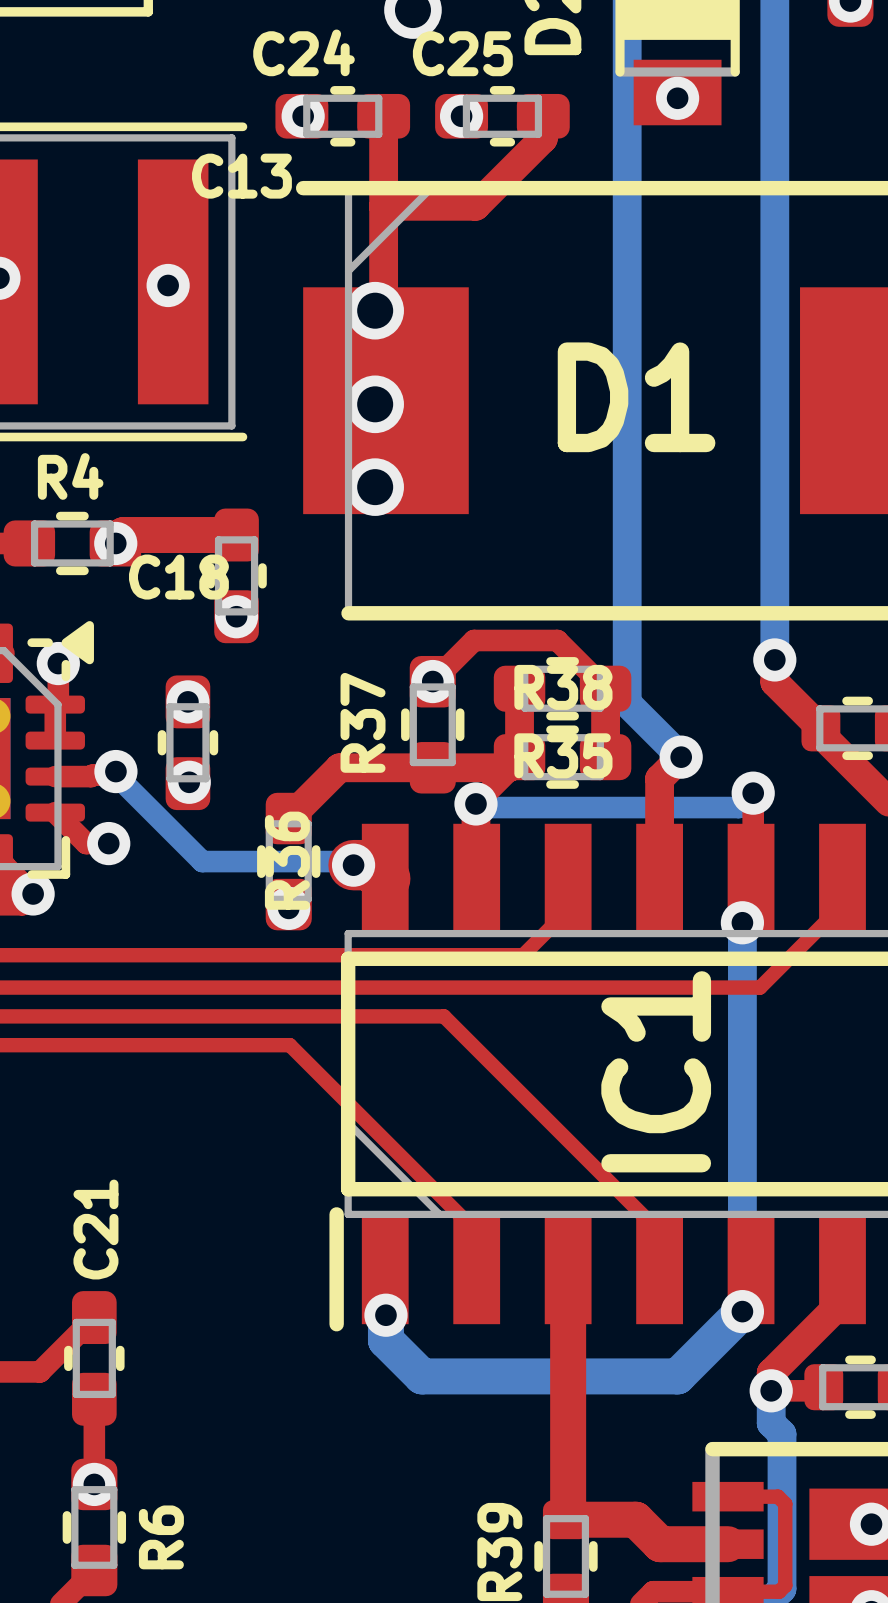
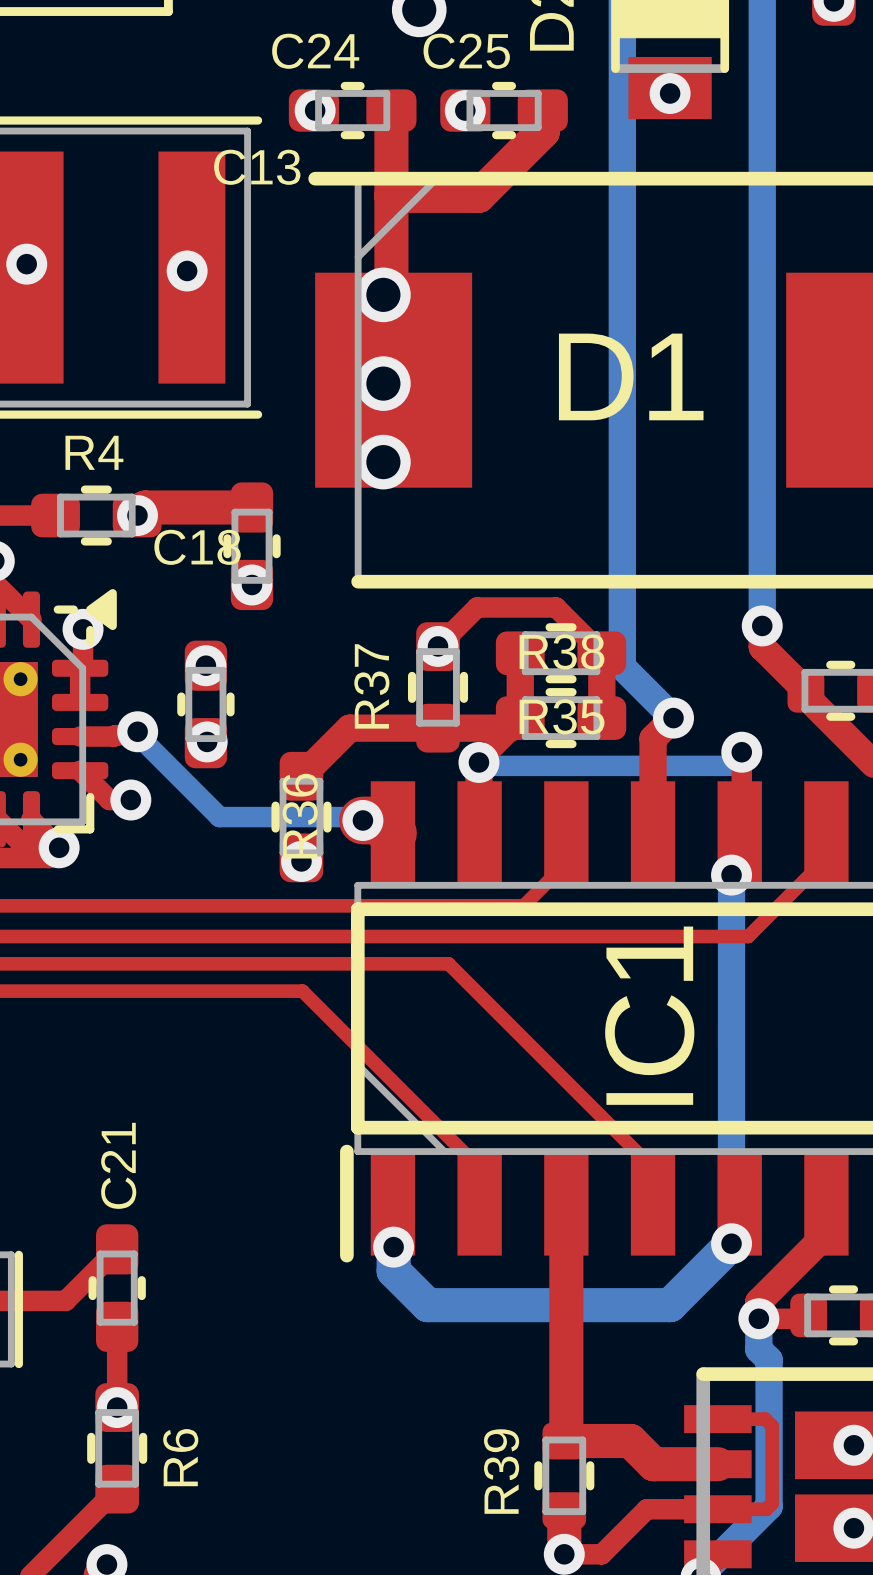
top track width: thin (383, 116) (383, 302) (375, 310) -> thick (391, 110) (391, 286) (383, 294)
top track width: thin (543, 116) (543, 138) (475, 206) (383, 206) -> thick (542, 110) (542, 131) (478, 195) (391, 195)

